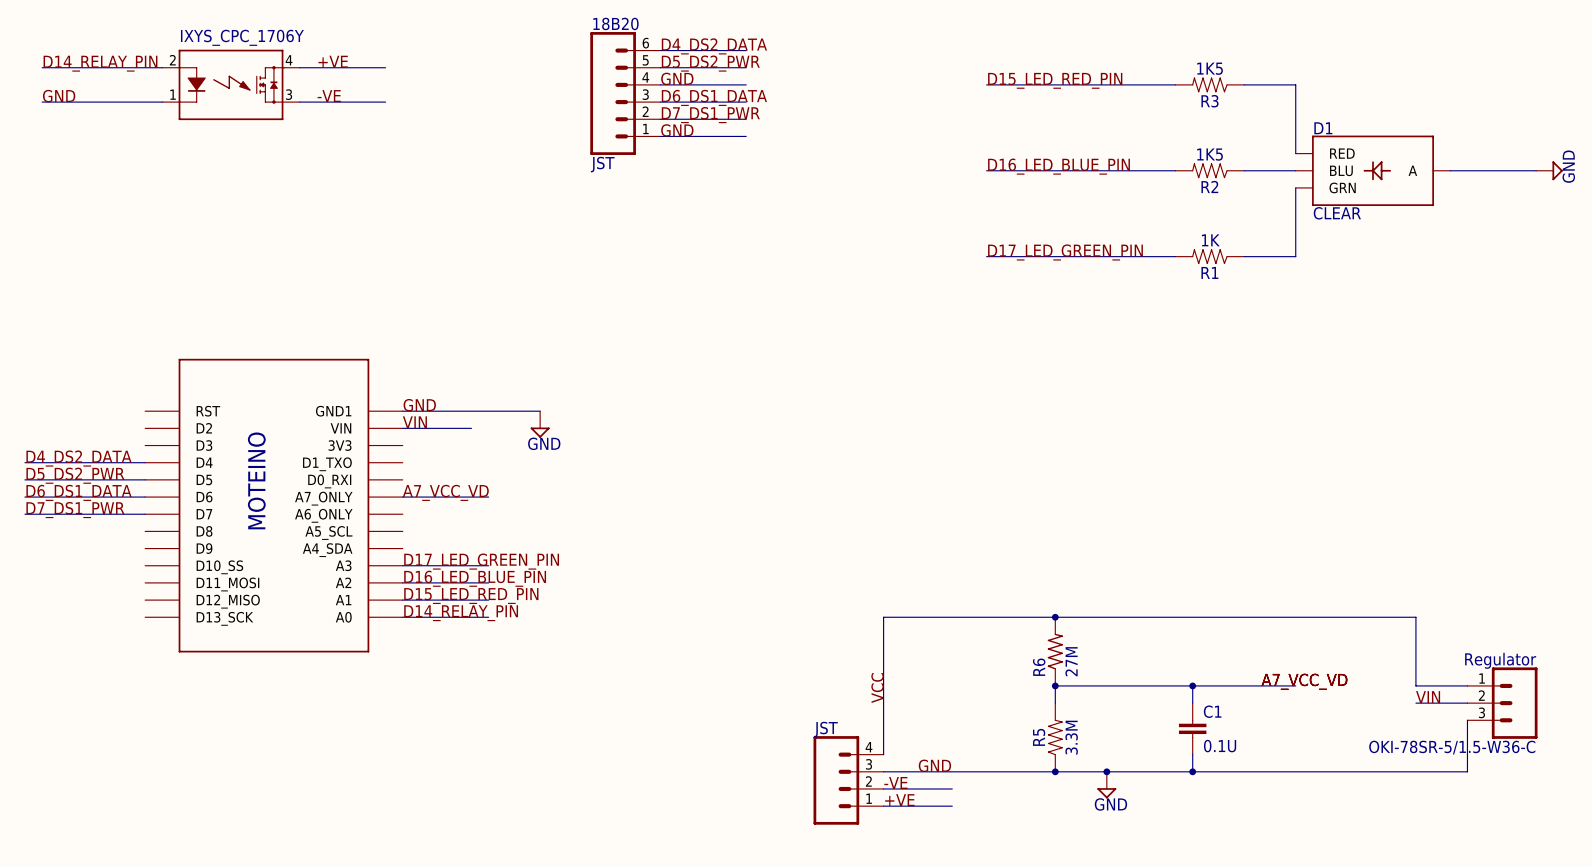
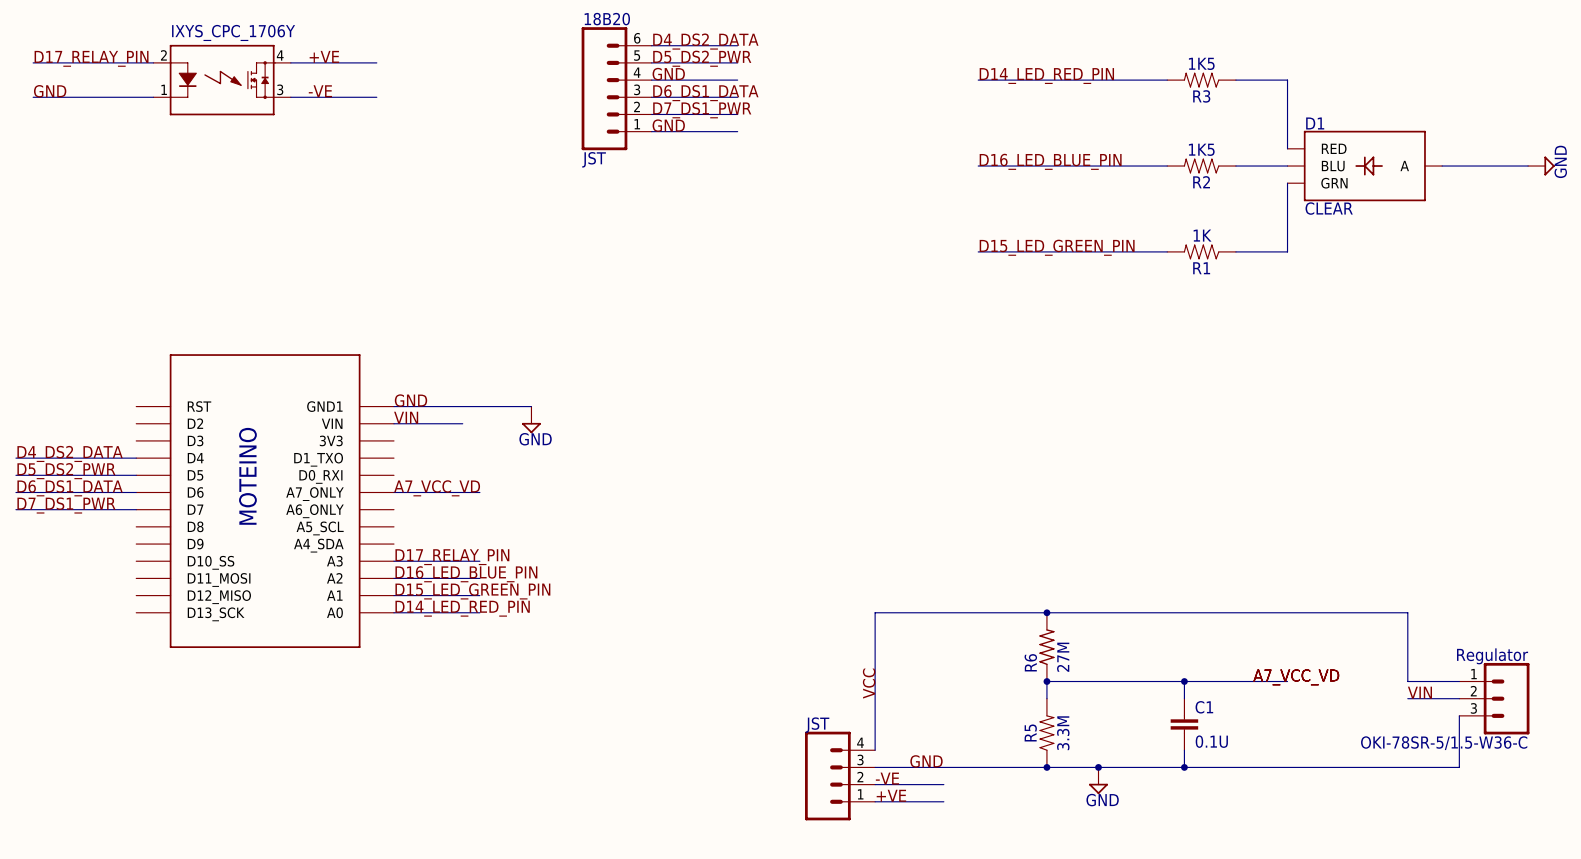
label: D14_RELAY_PIN (100, 63) -> D17_RELAY_PIN (91, 58)
label: D15_LED_RED_PIN (1055, 80) -> D14_LED_RED_PIN (1046, 76)
label: D17_LED_GREEN_PIN (1065, 252) -> D15_LED_GREEN_PIN (1057, 247)
label: D17_LED_GREEN_PIN (481, 561) -> D17_RELAY_PIN (452, 557)
label: D15_LED_RED_PIN (471, 596) -> D15_LED_GREEN_PIN (472, 591)
label: D14_RELAY_PIN (461, 613) -> D14_LED_RED_PIN (462, 608)

